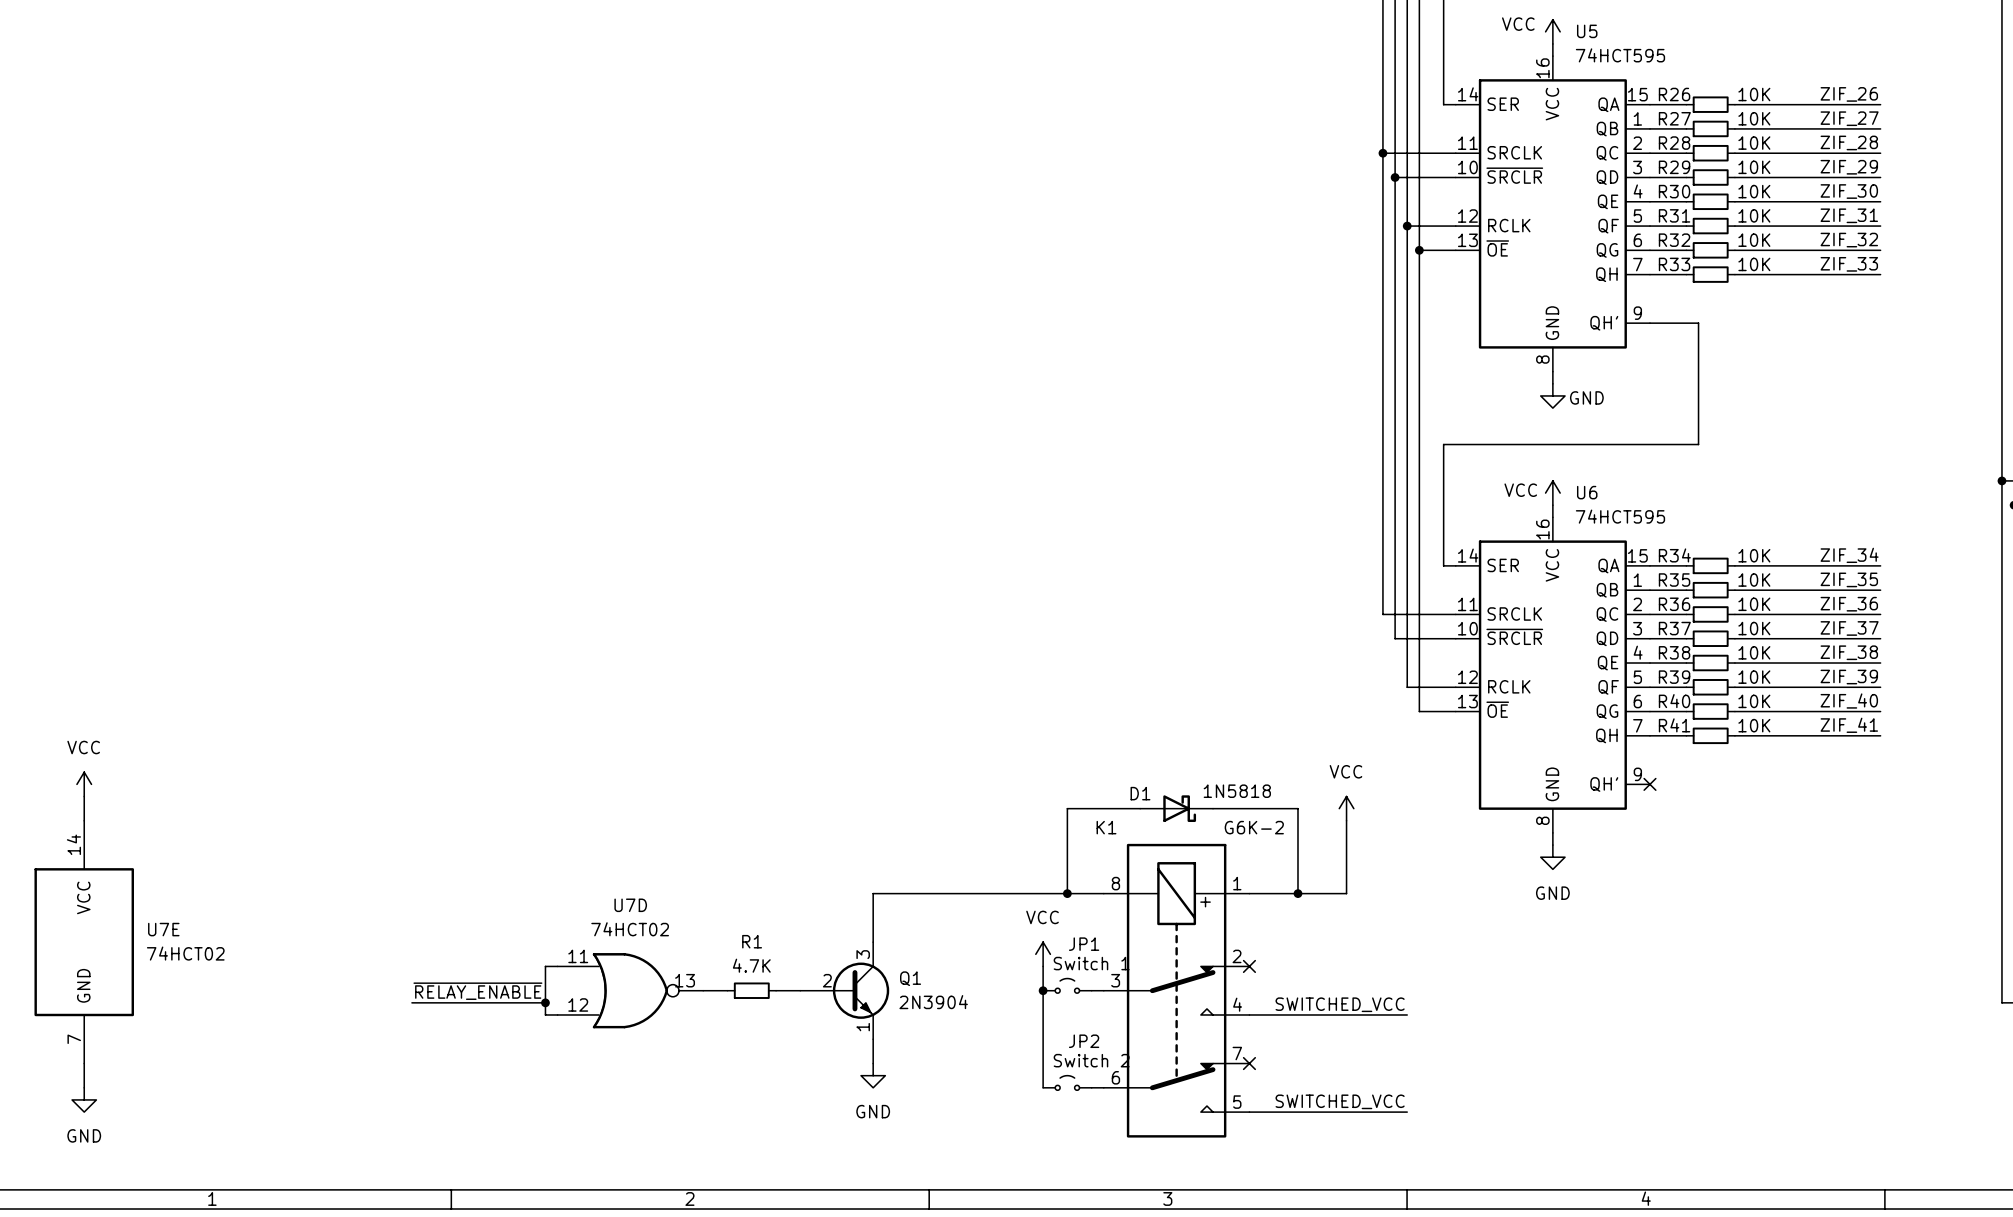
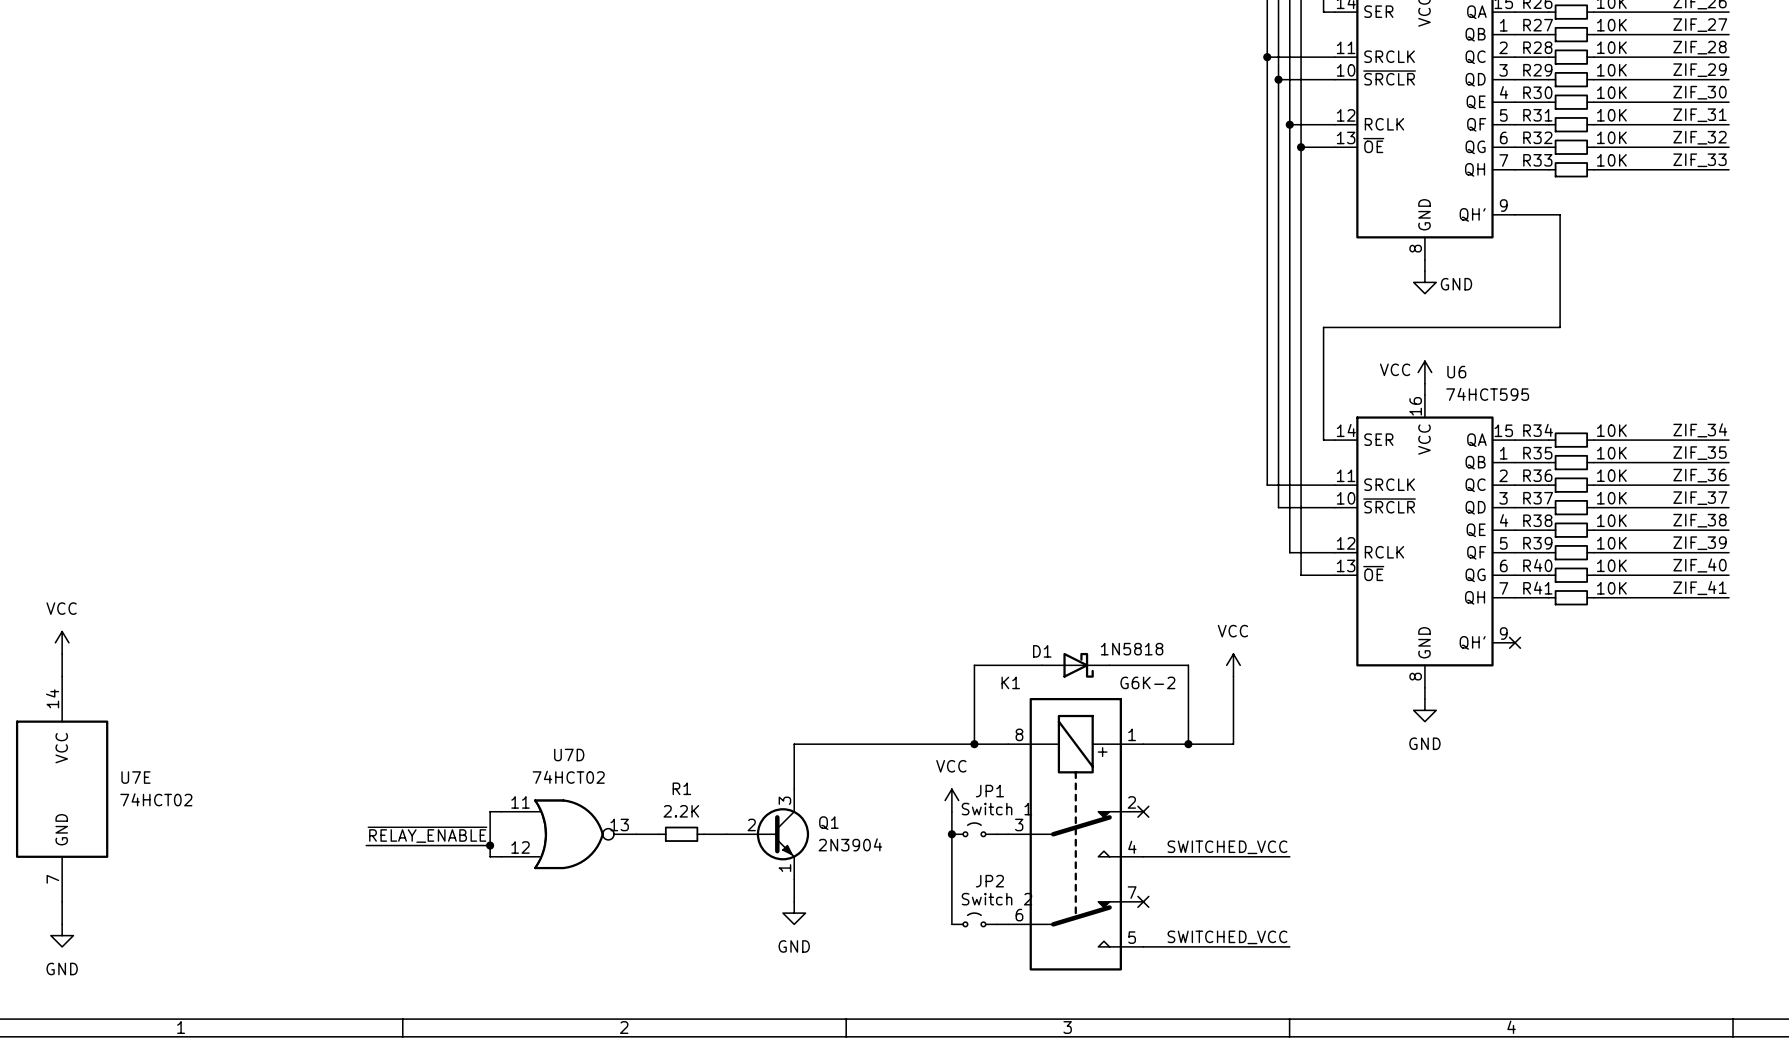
R1 value: 4.7K (751, 965) -> 2.2K (681, 811)

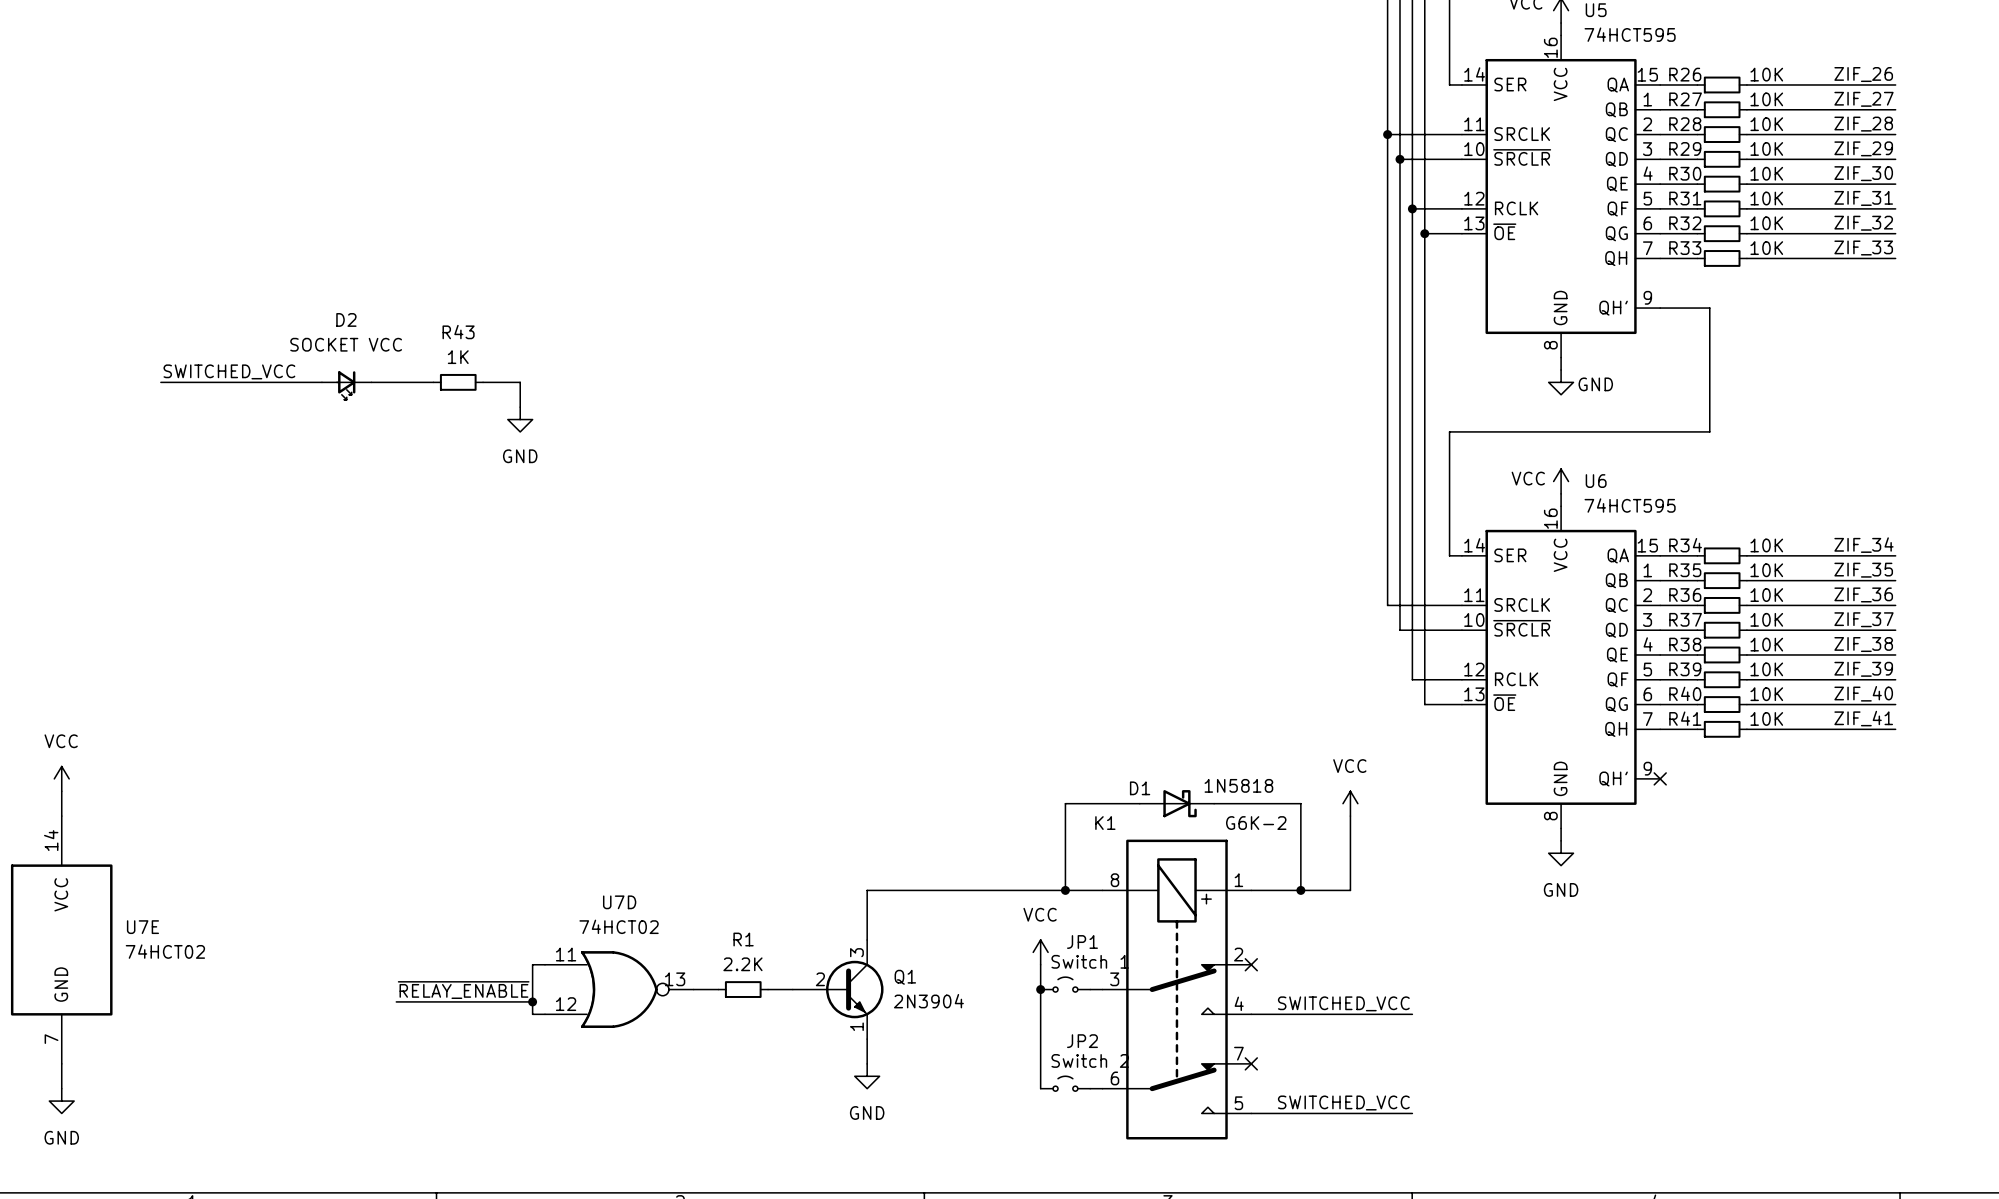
label: none -> SWITCHED_VCC (229, 371)
wire: none -> (160, 382) (321, 382)
wire: none -> (371, 382) (433, 382)
R43: none -> 1K (458, 382)
wire: none -> (483, 382) (520, 382) (520, 407)
D2: none -> SOCKET VCC (346, 385)
power symbol: none -> GND (520, 419)

